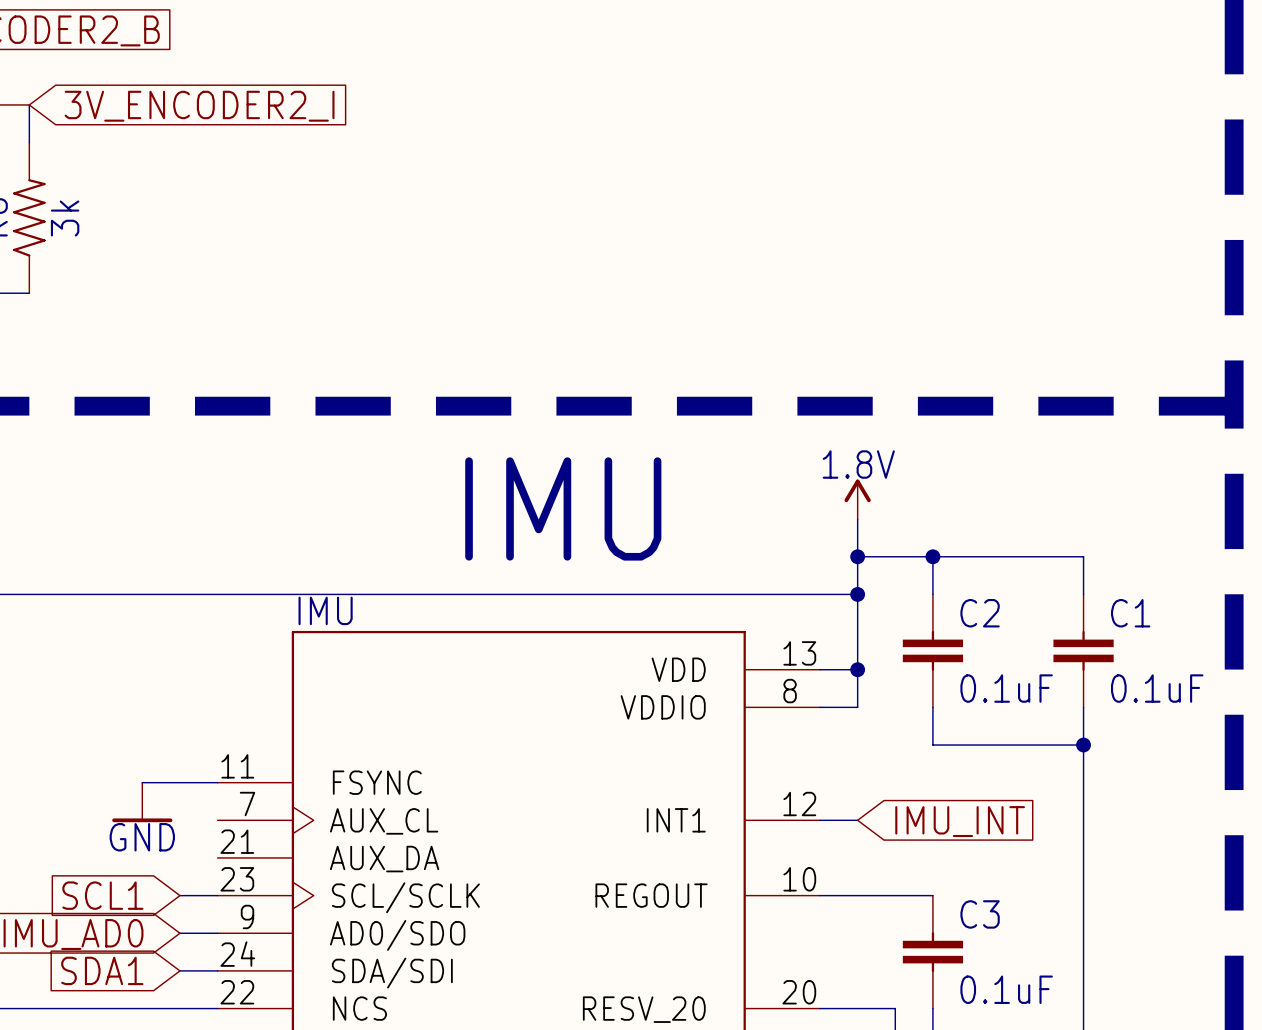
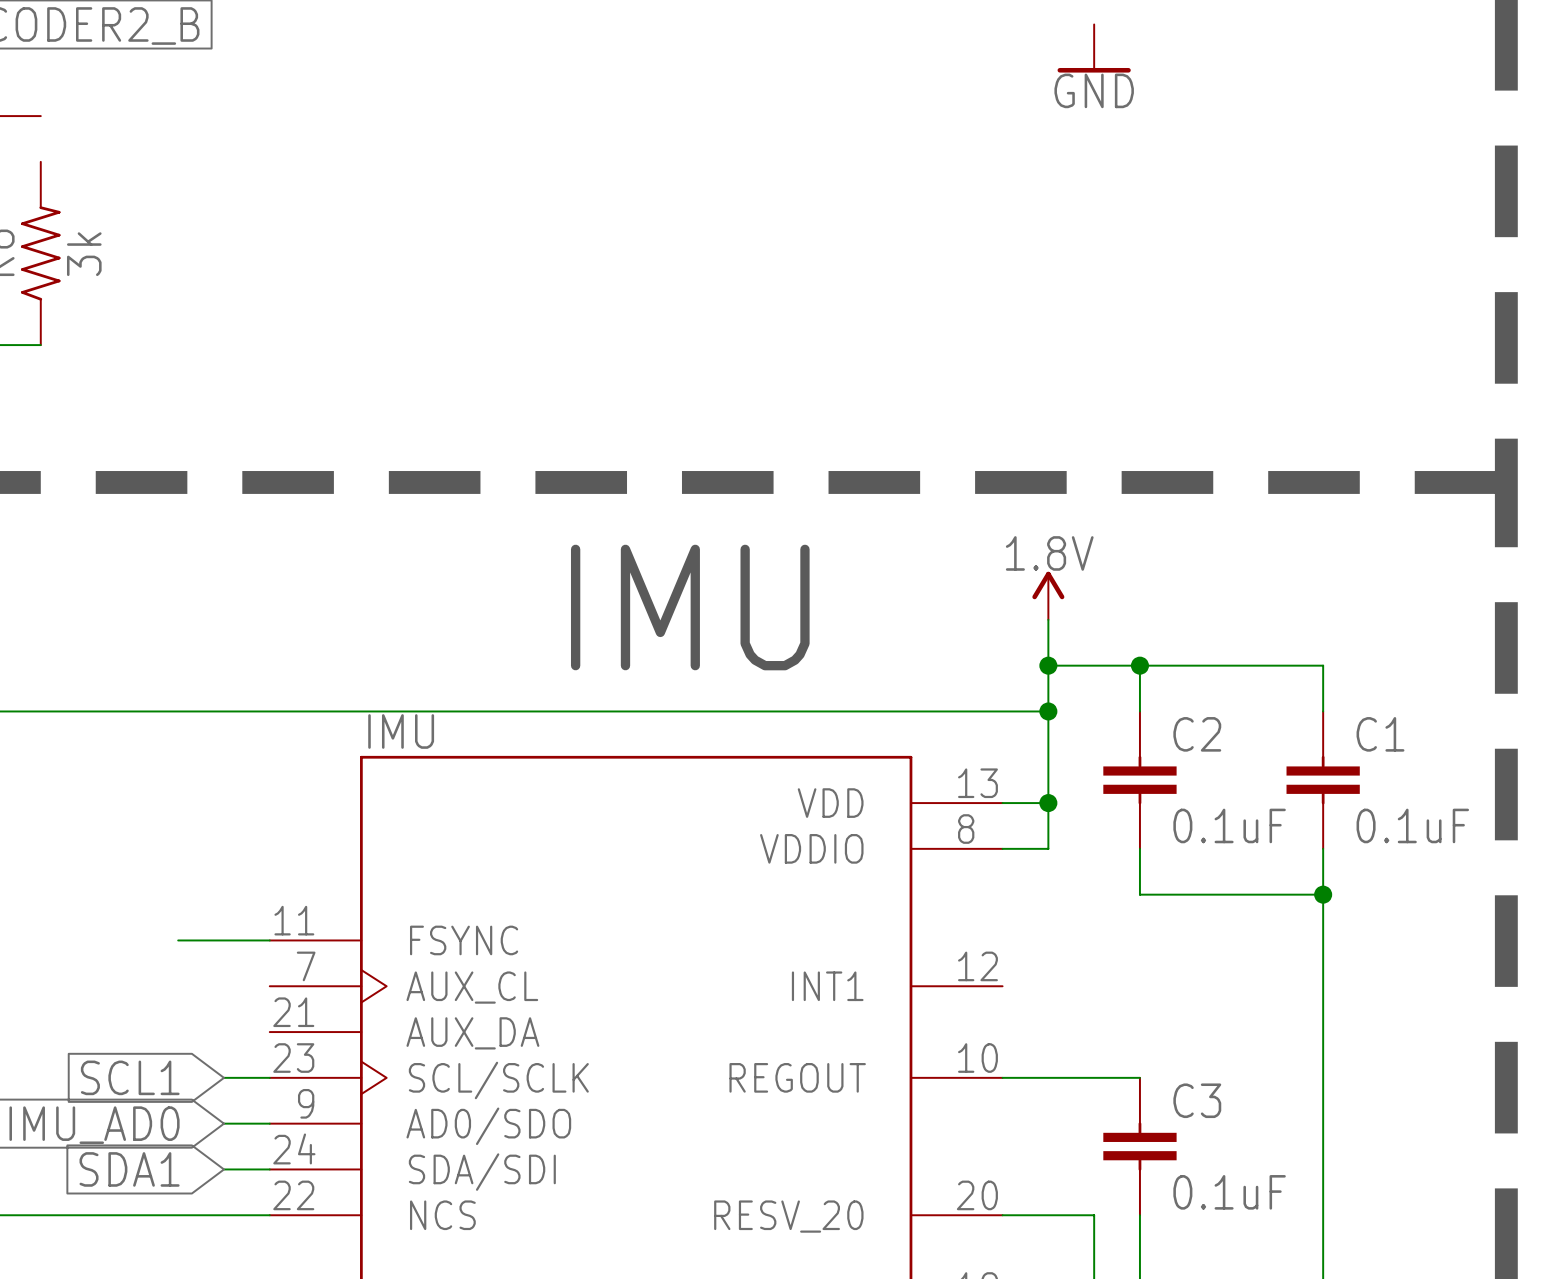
power symbol: none -> GND (1094, 48)
wire: (29, 104) (29, 142) -> none
global label: 3V_ENCODER2_I (199, 106) -> none
power symbol: GND (142, 802) -> none
wire: (820, 820) (857, 820) -> none
global label: IMU_INT (960, 821) -> none

